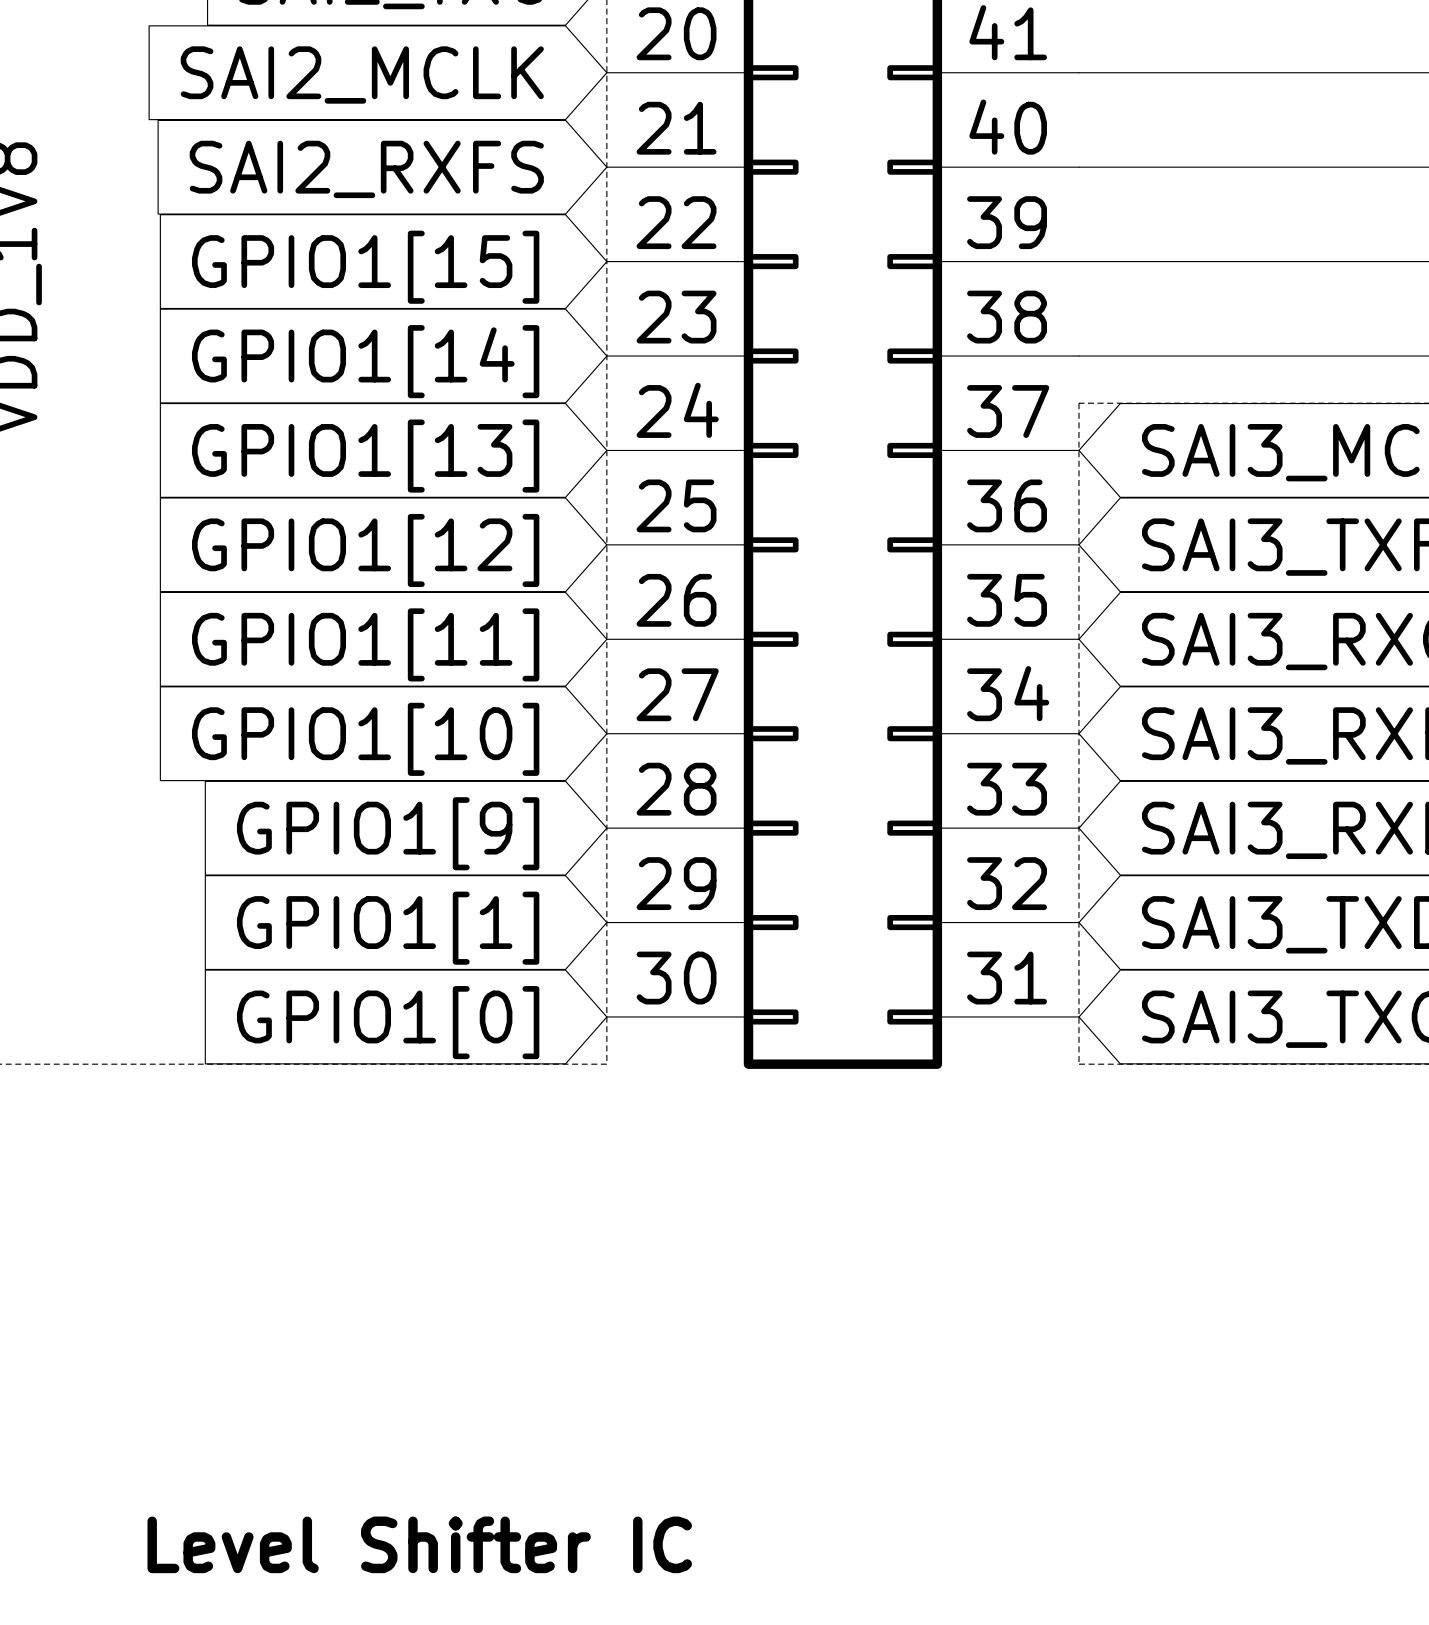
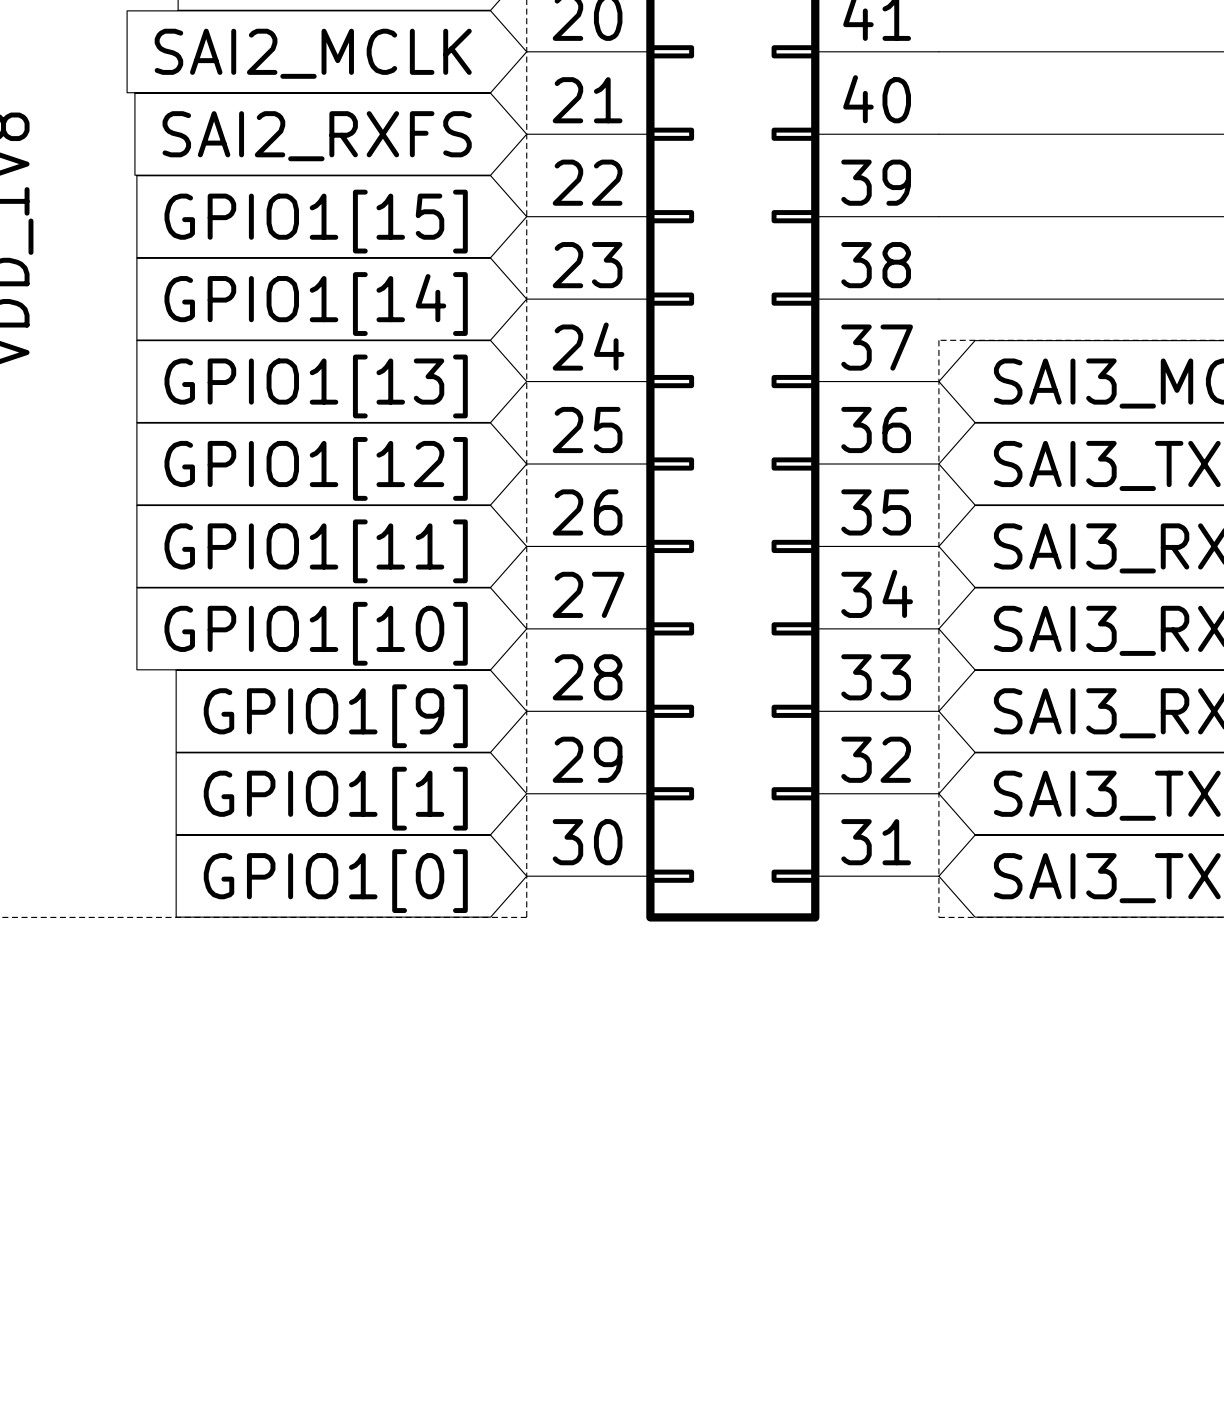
text: Level Shifter IC (419, 1544) -> none

